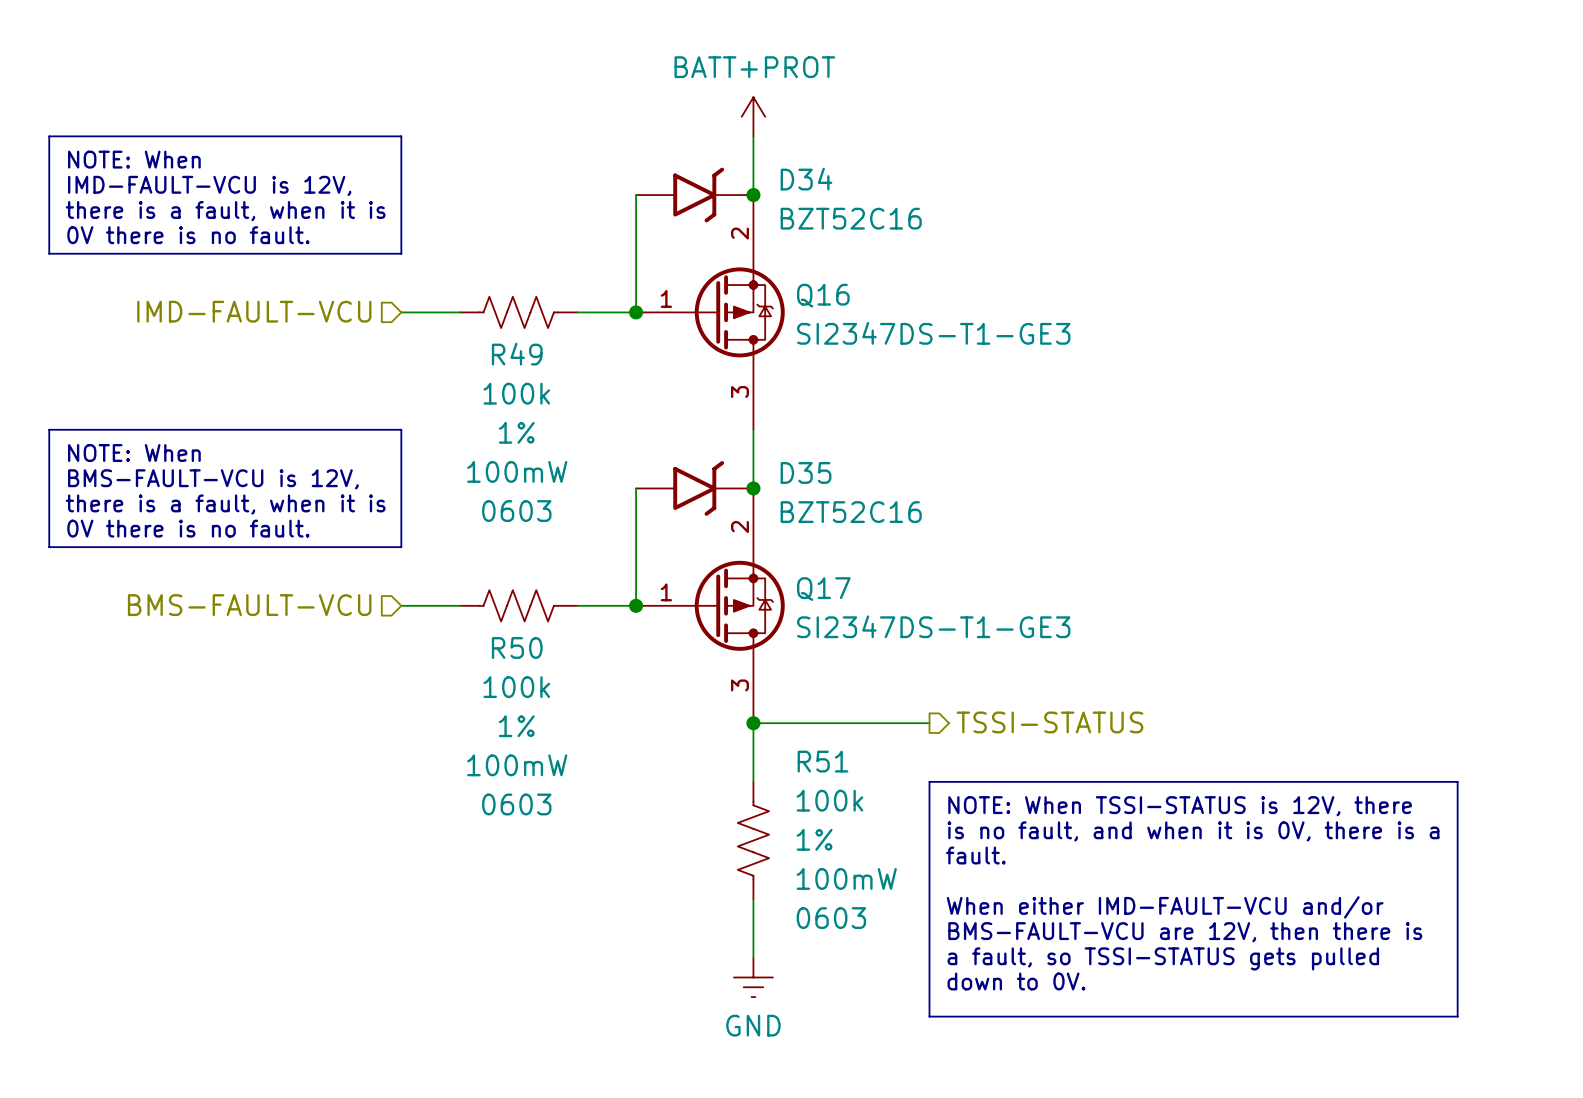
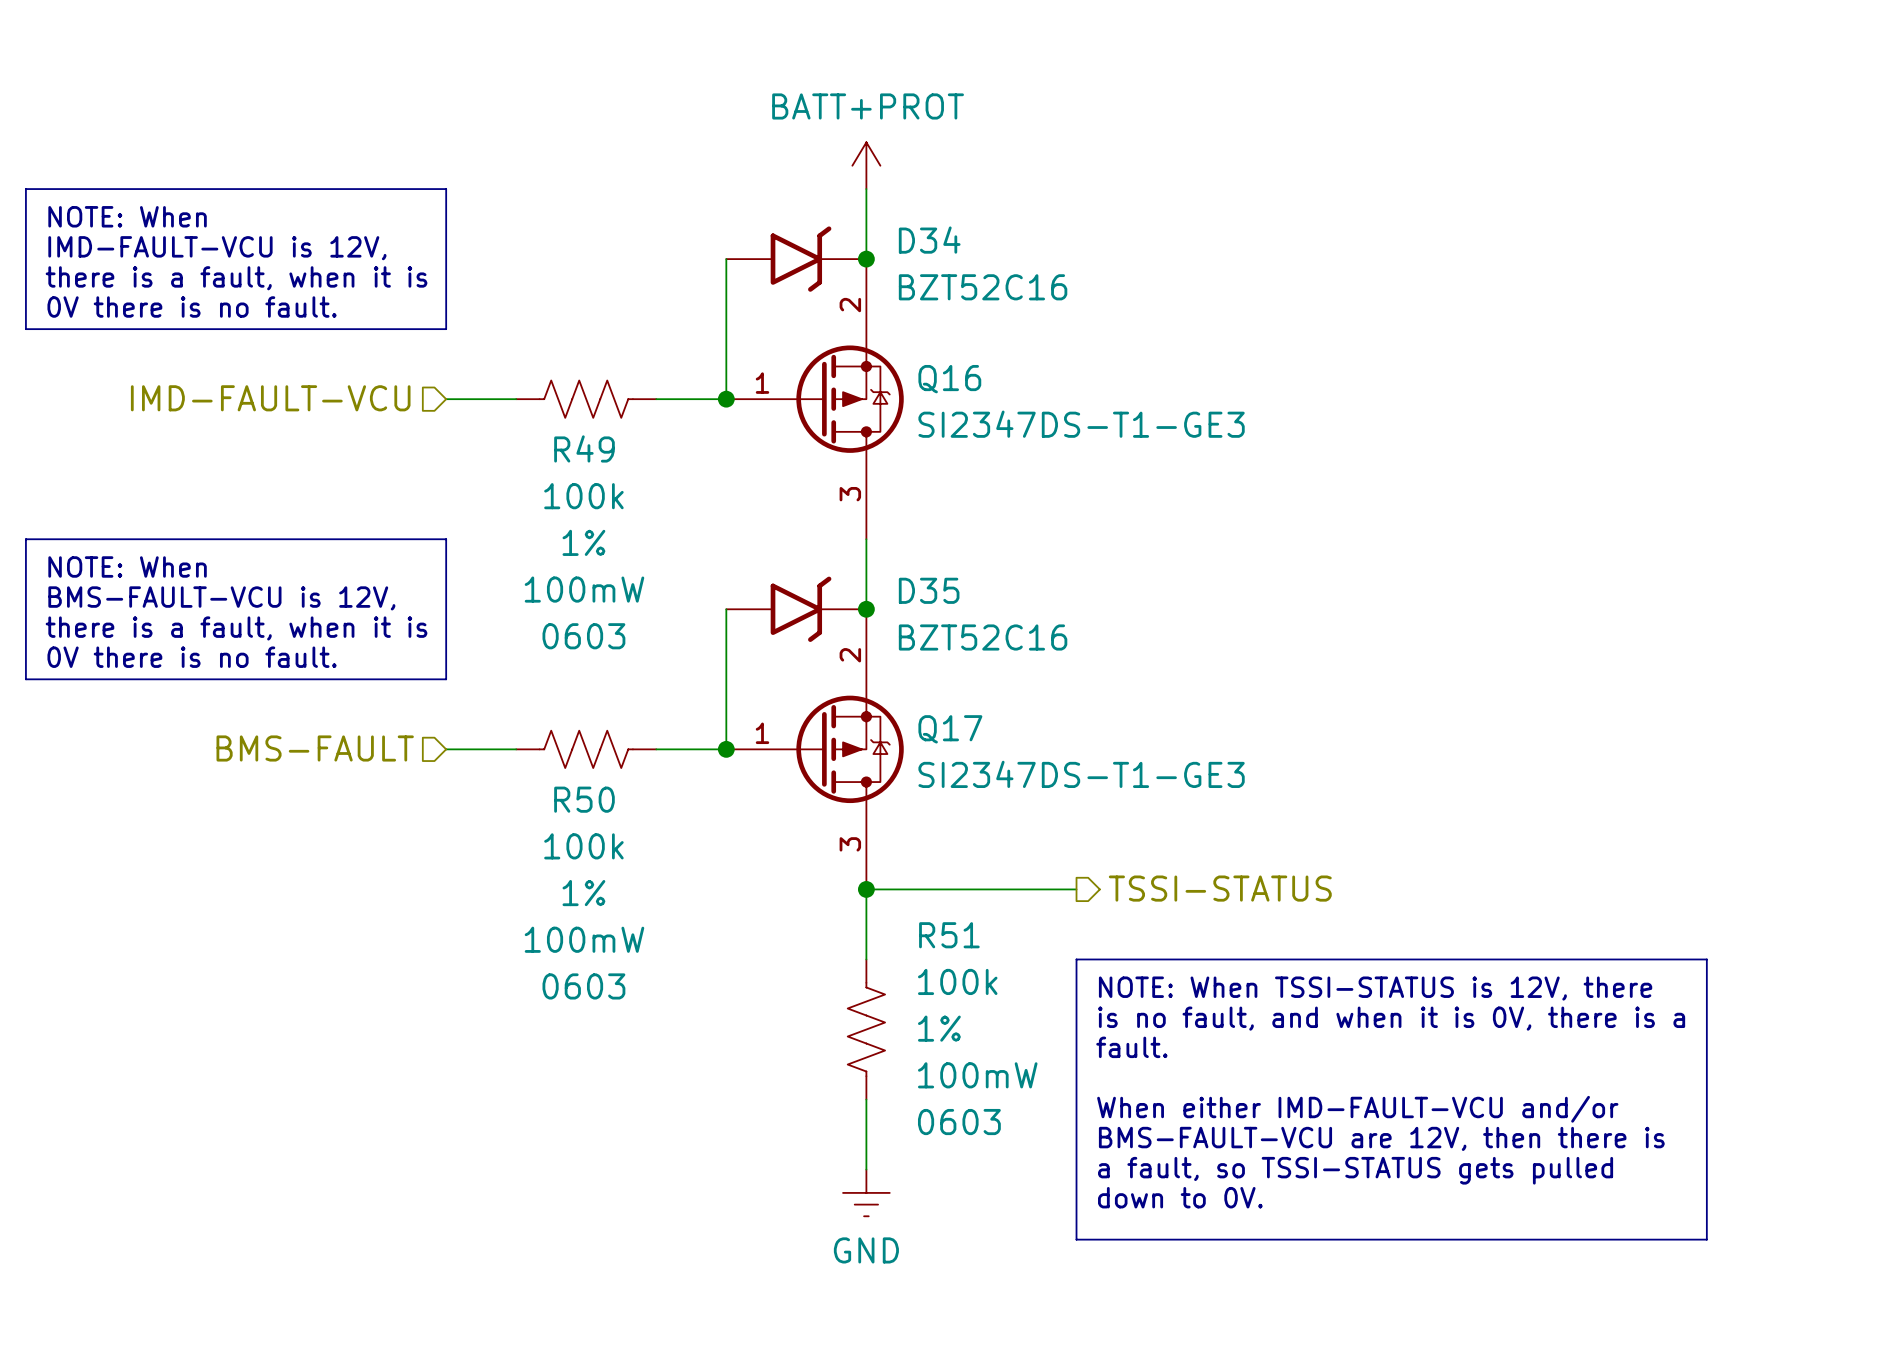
hierarchical label: BMS-FAULT-VCU (249, 605) -> BMS-FAULT (315, 748)

